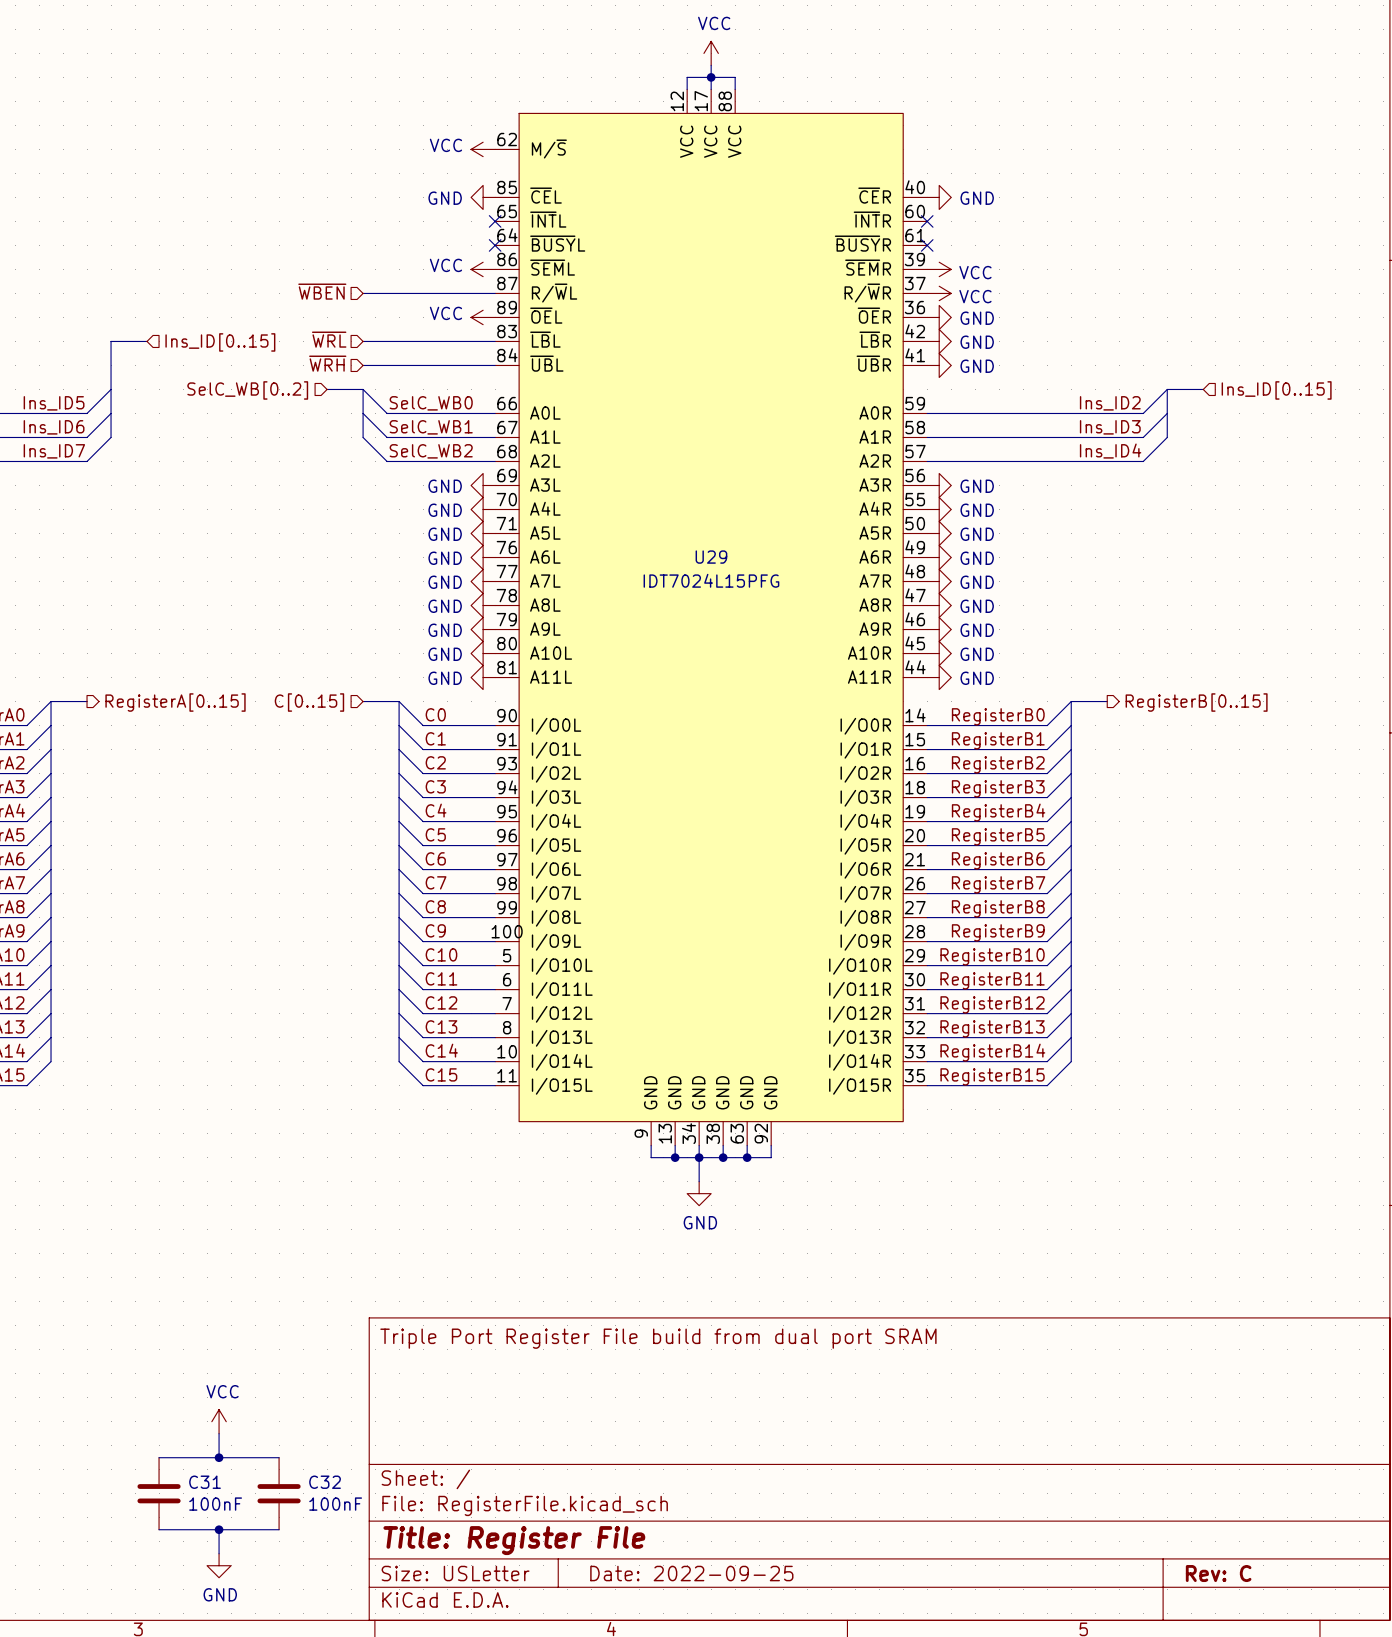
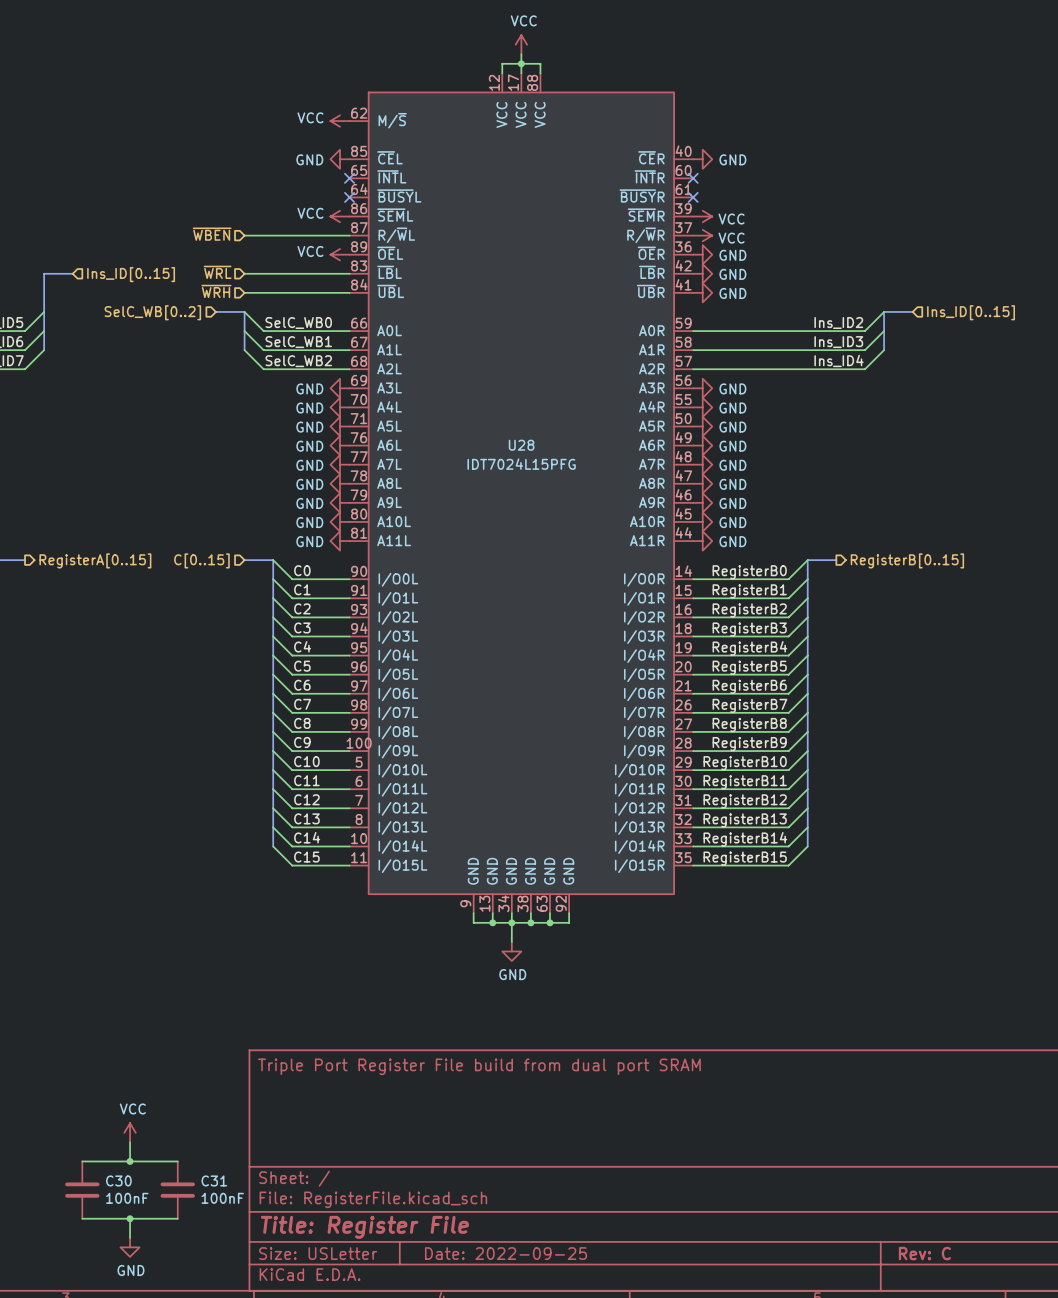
U29 name: U29 (711, 557) -> U28 (521, 445)
C31 name: C31 (205, 1482) -> C30 (118, 1180)
C32 name: C32 (325, 1482) -> C31 (214, 1180)

